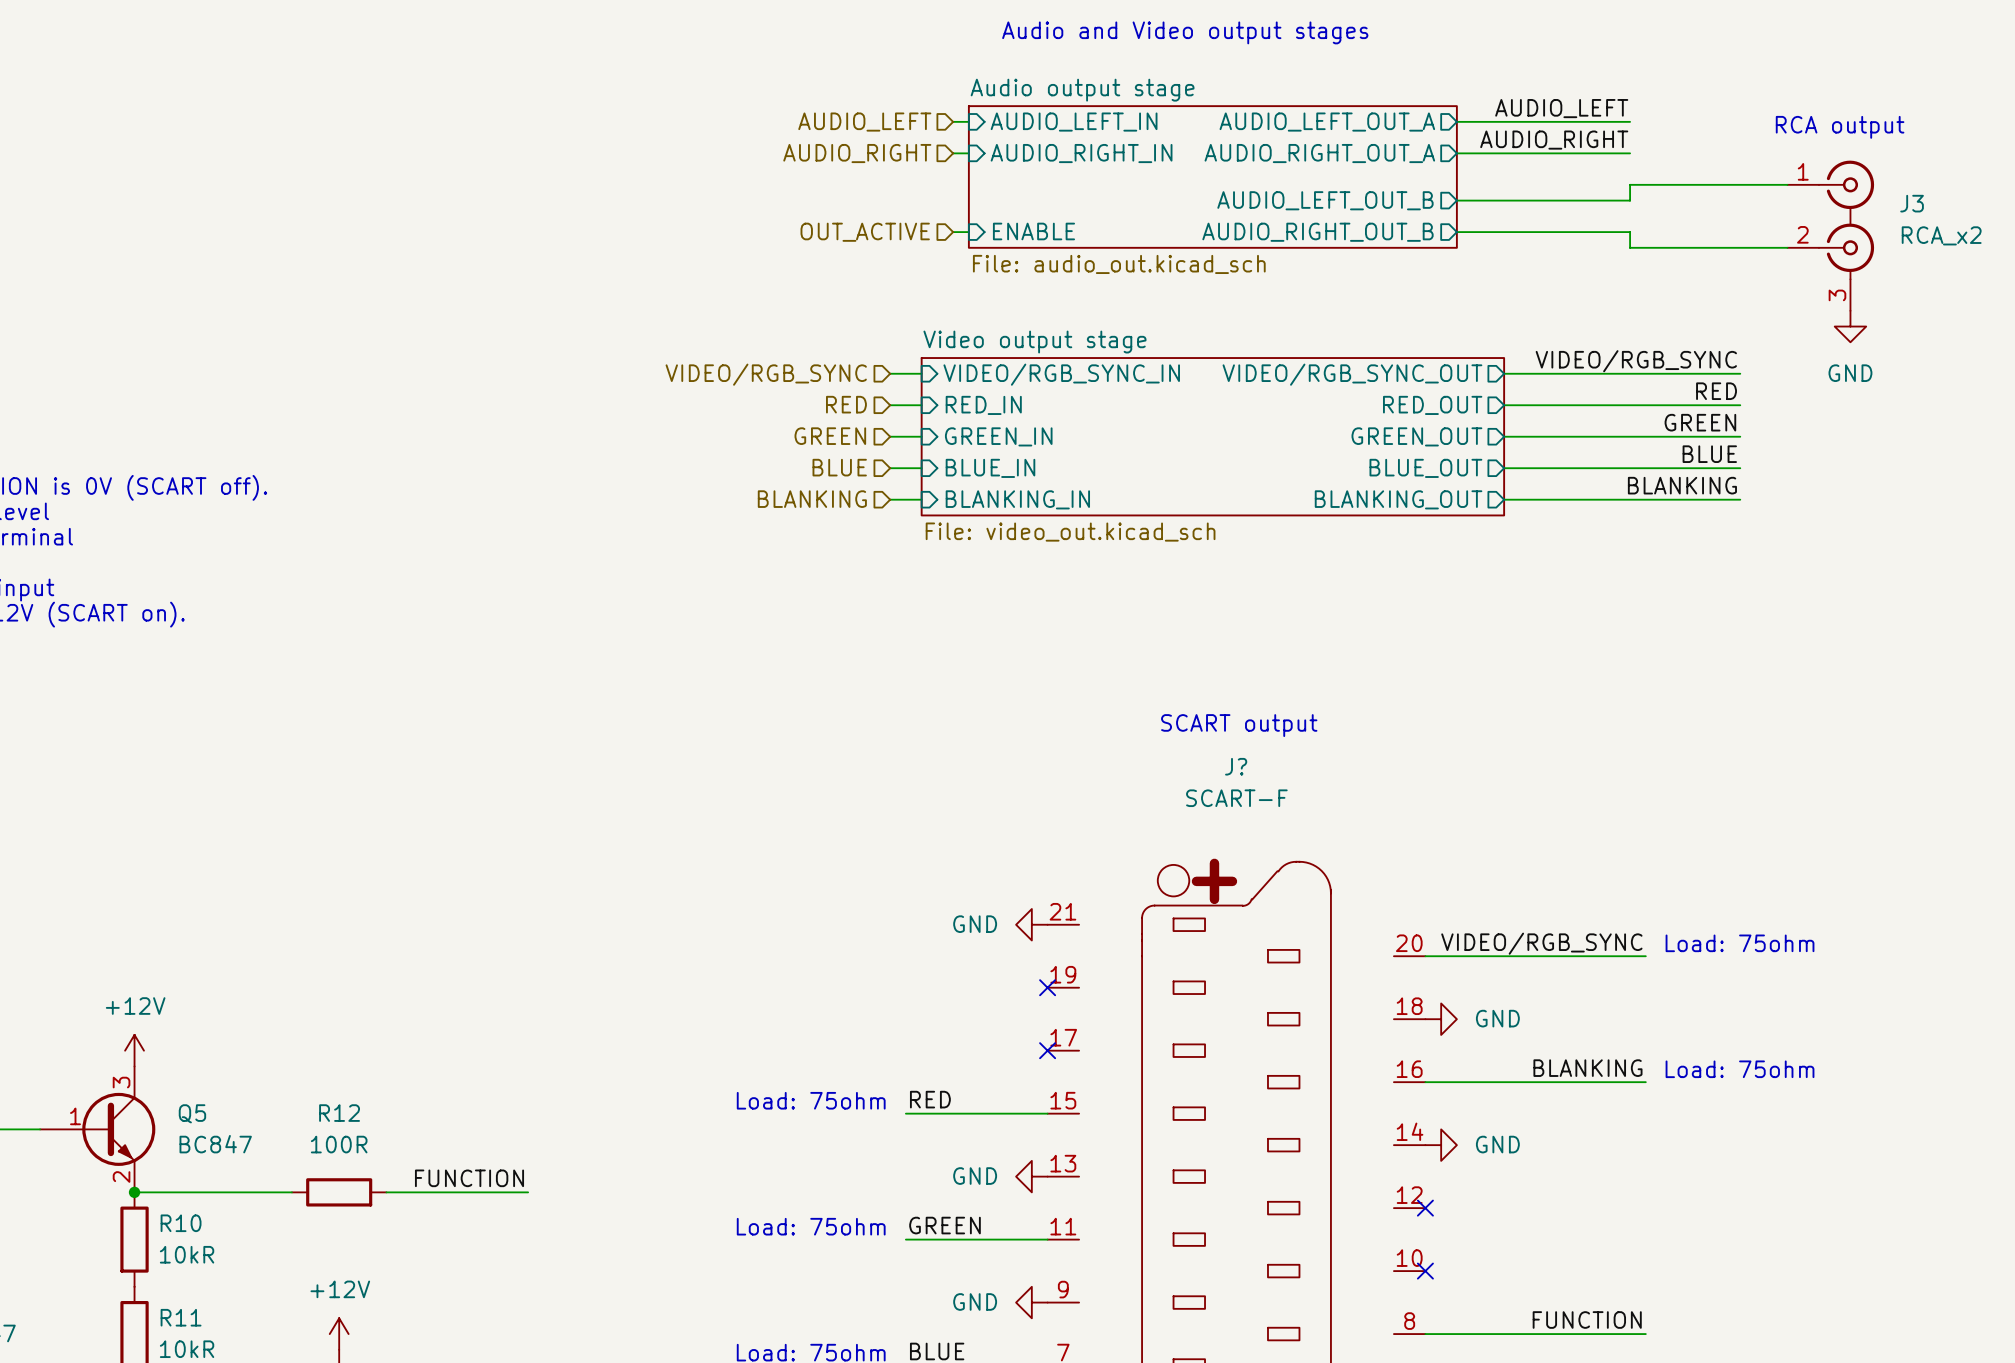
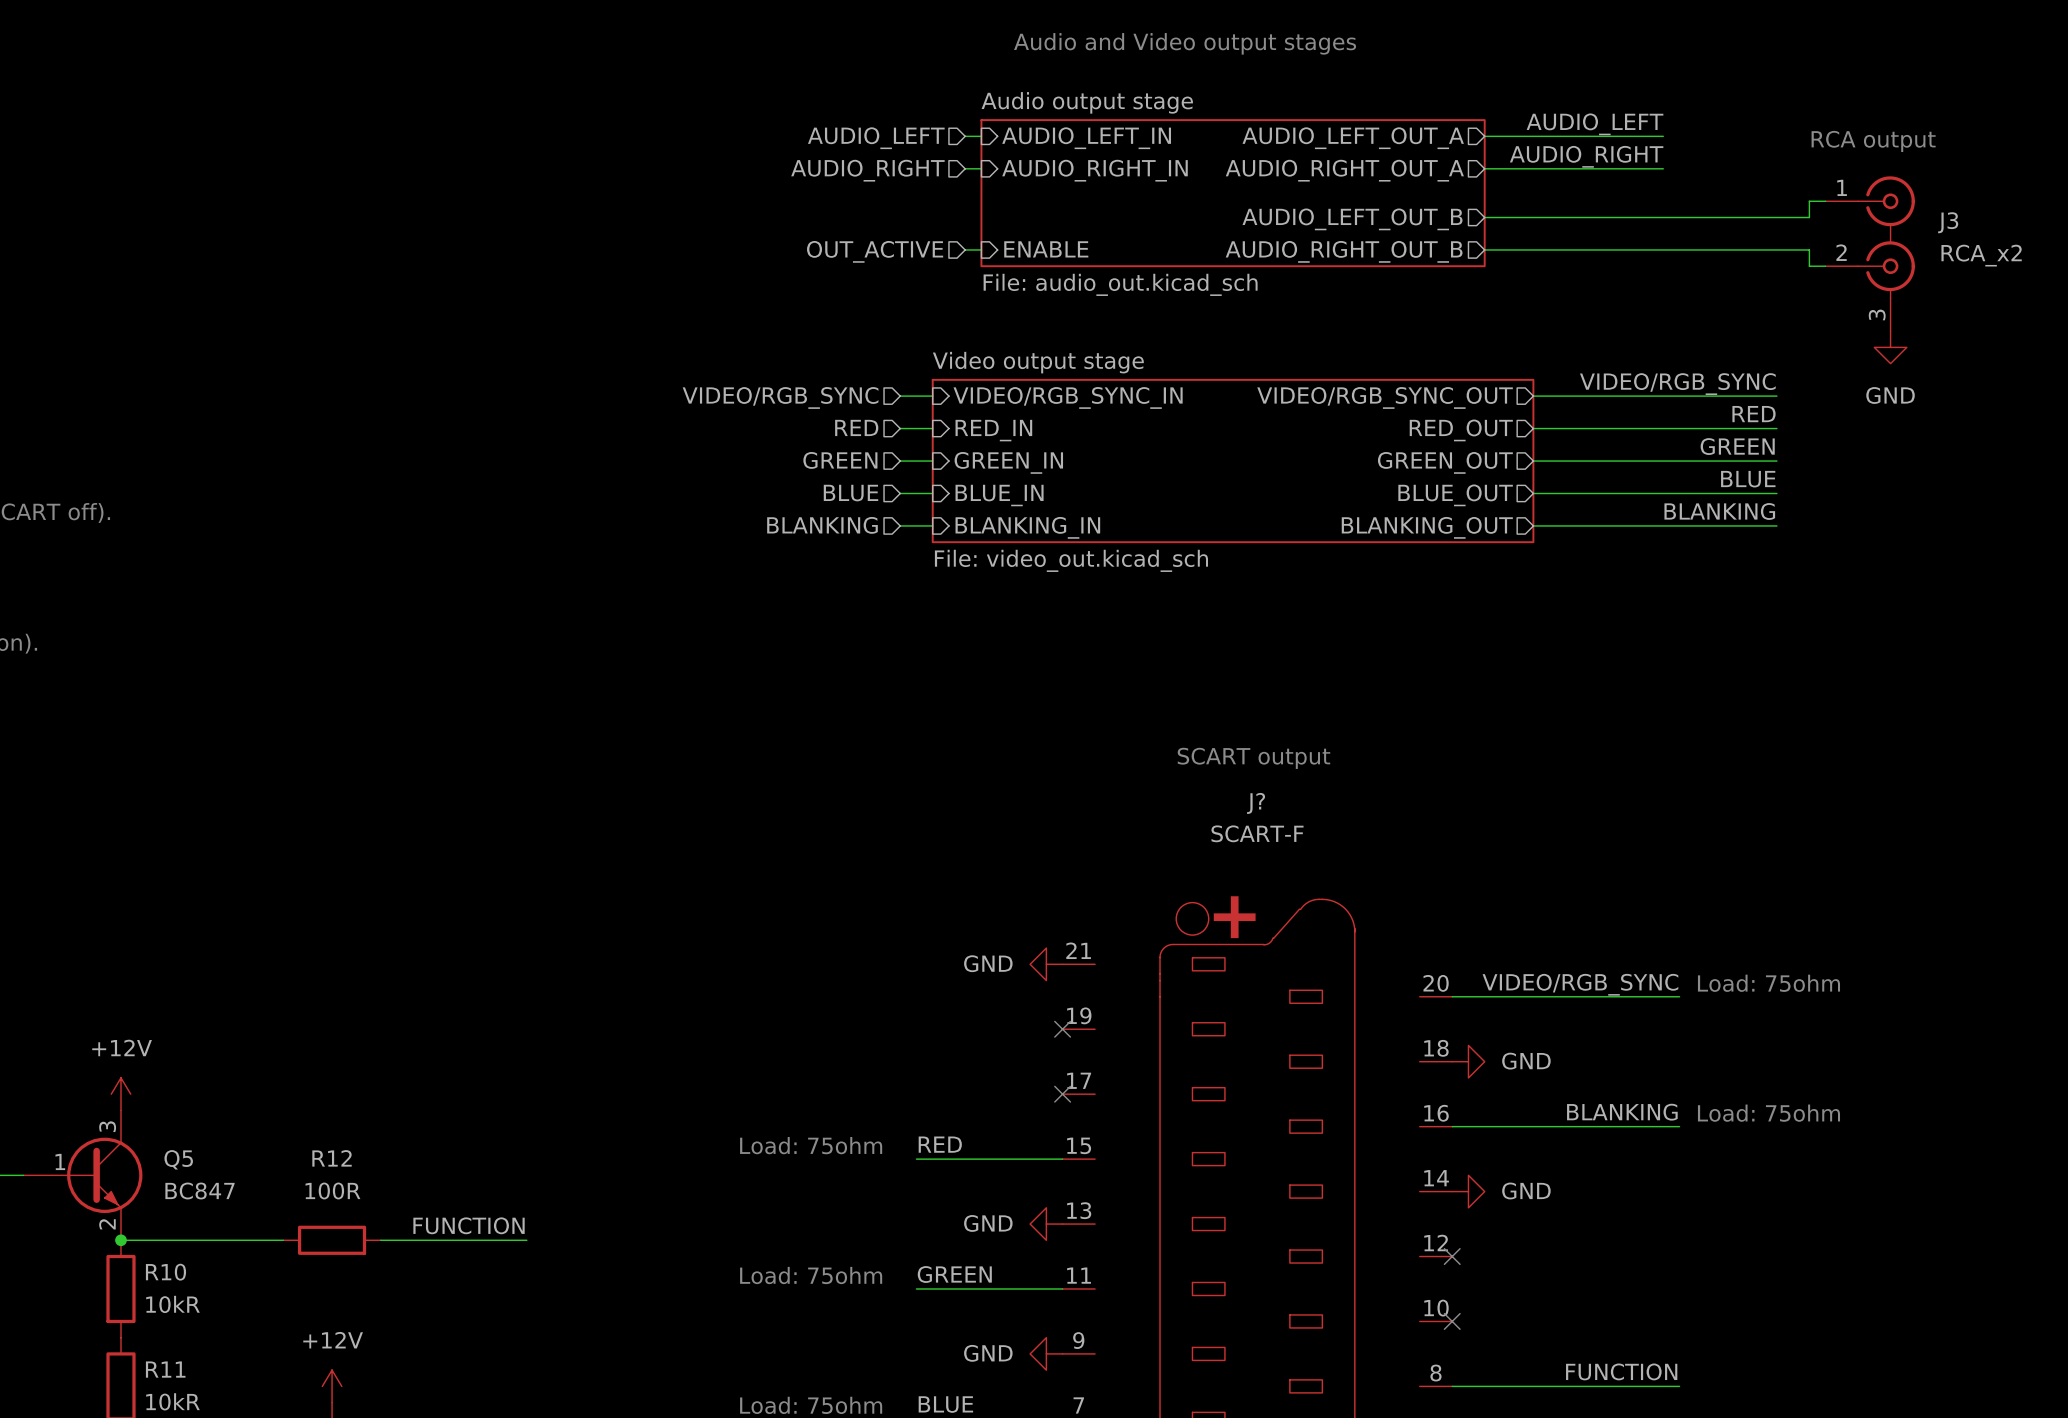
wire: (1771, 184) (1630, 184) (1630, 200) -> (1809, 201) (1809, 217) (1663, 217)
wire: (1630, 232) (1630, 247) (1771, 247) -> (1663, 249) (1809, 249) (1809, 266)

